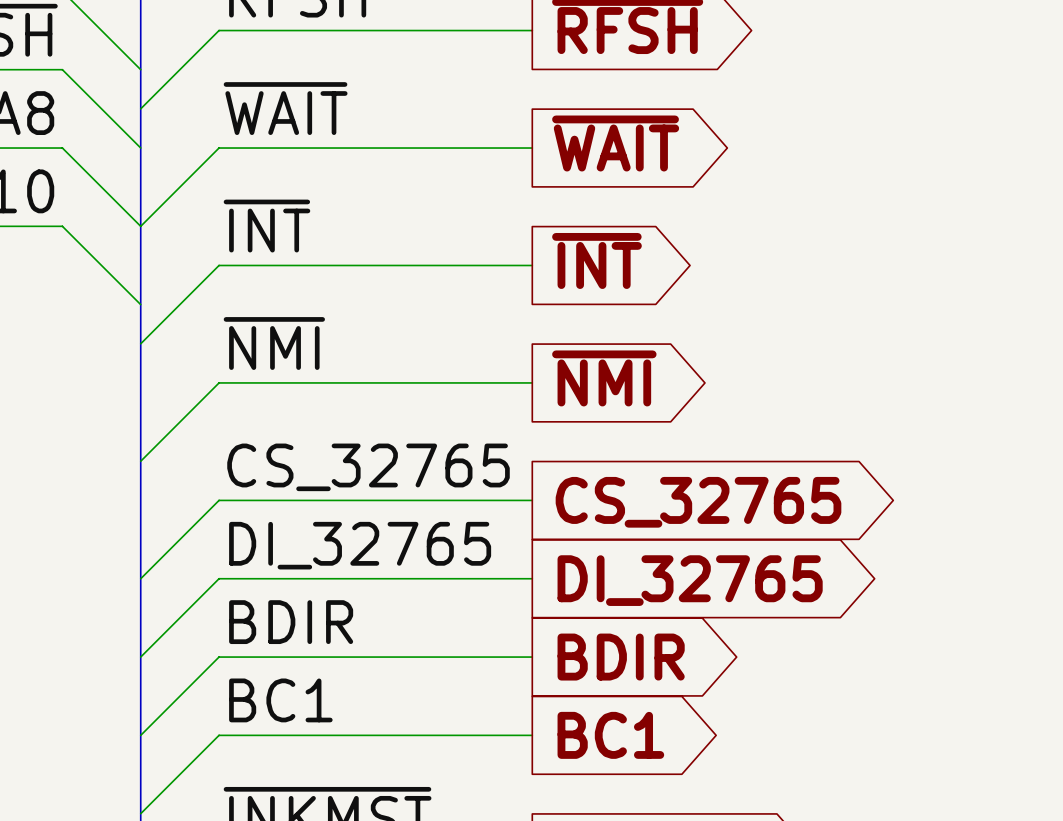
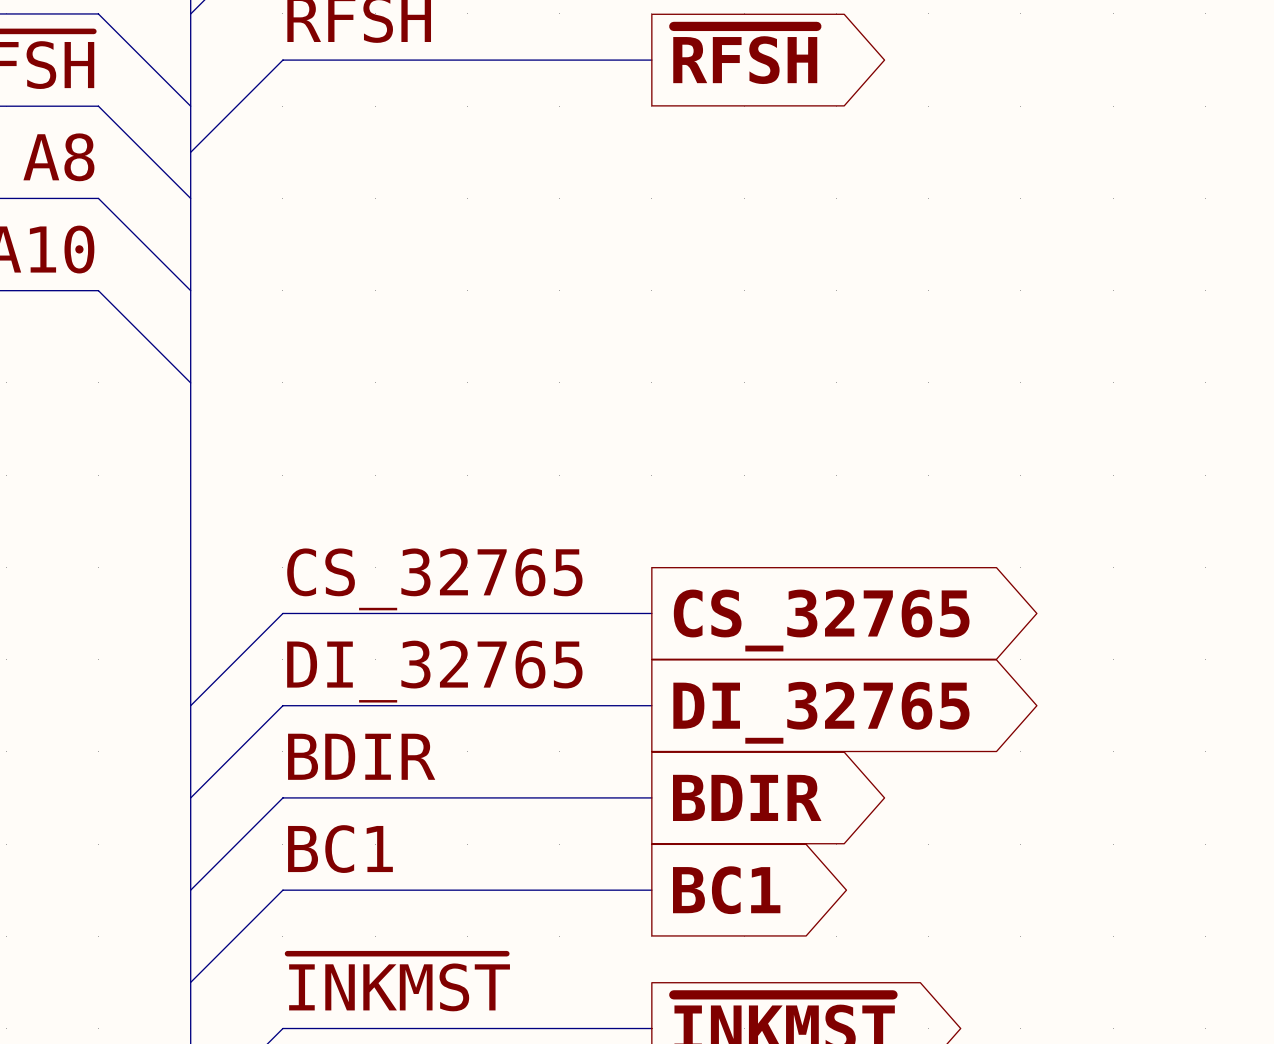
label: ~{WAIT} (285, 108) -> none
global label: ~{WAIT} (615, 143) -> none
wire: (532, 148) (219, 148) (140, 226) -> none
label: ~{INT} (266, 226) -> none
global label: ~{INT} (596, 260) -> none
wire: (532, 265) (219, 265) (140, 343) -> none
label: ~{NMI} (274, 343) -> none
global label: ~{NMI} (604, 378) -> none
wire: (532, 382) (219, 382) (140, 461) -> none

